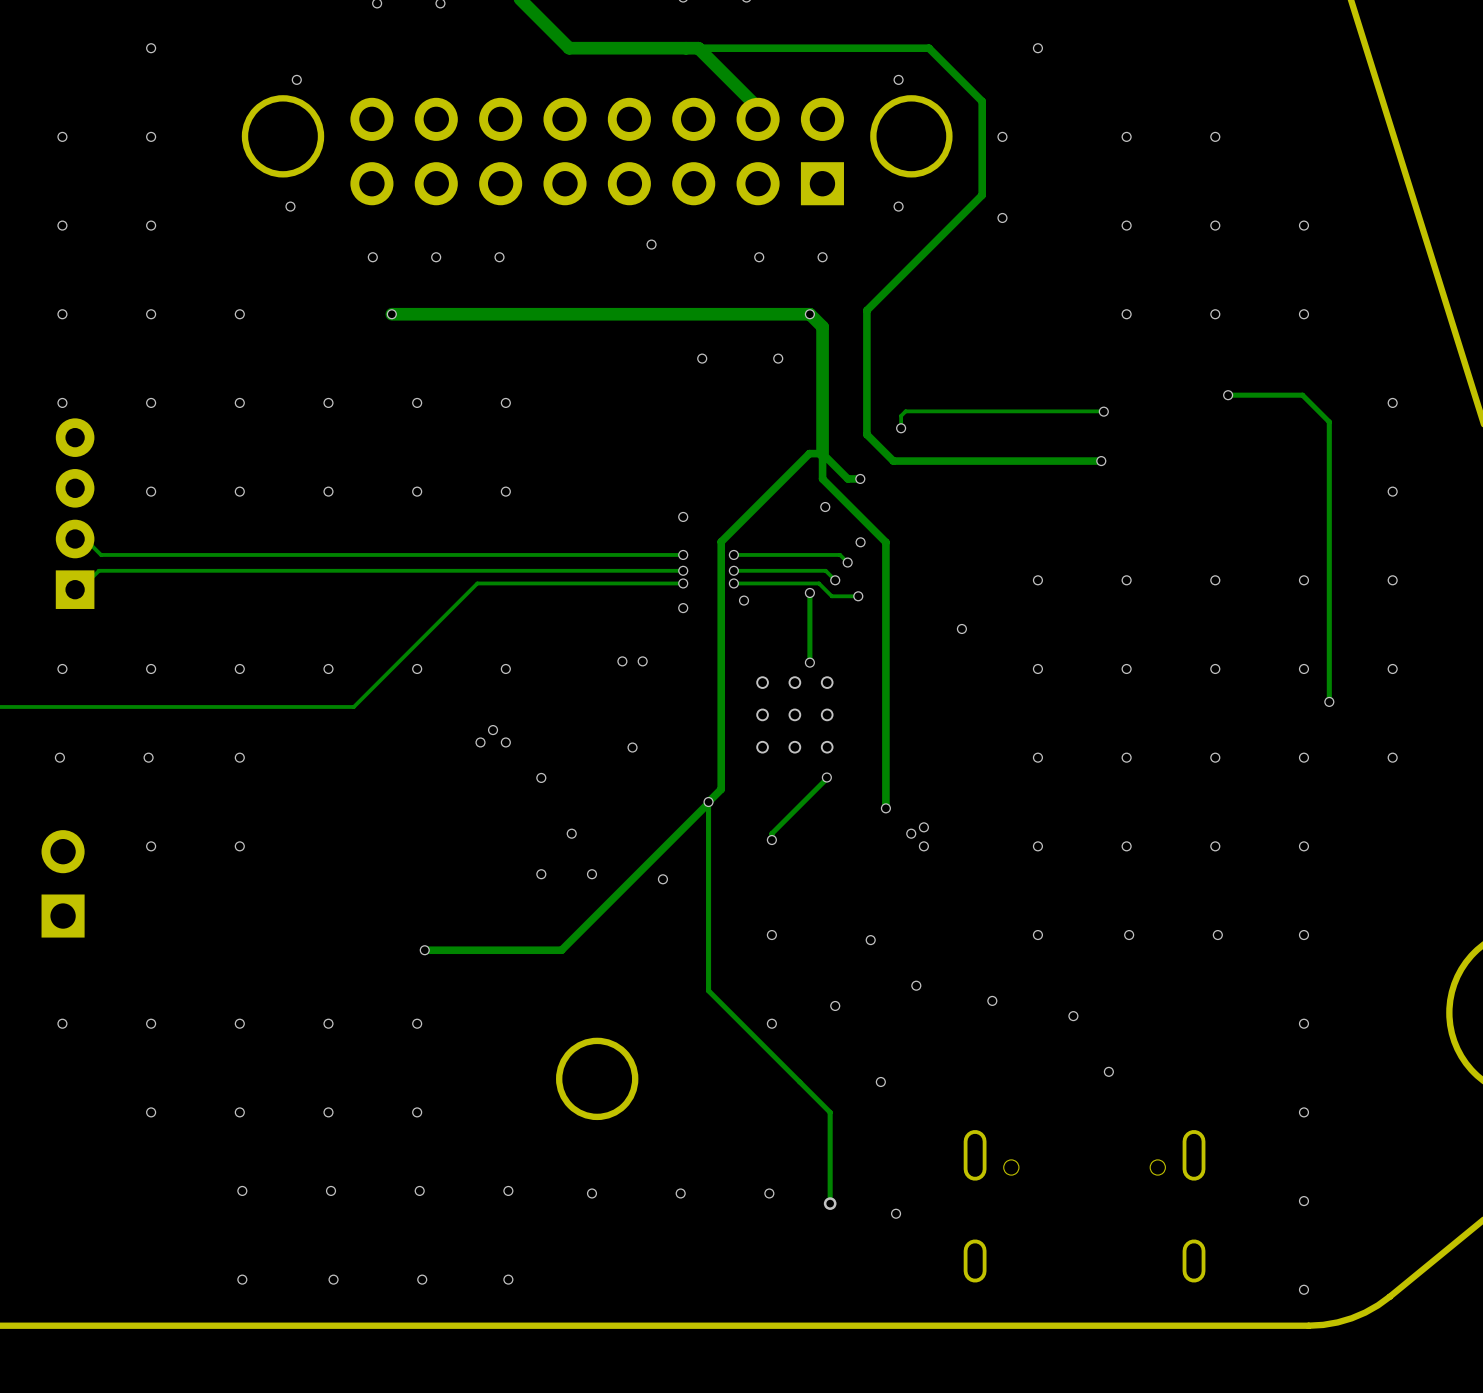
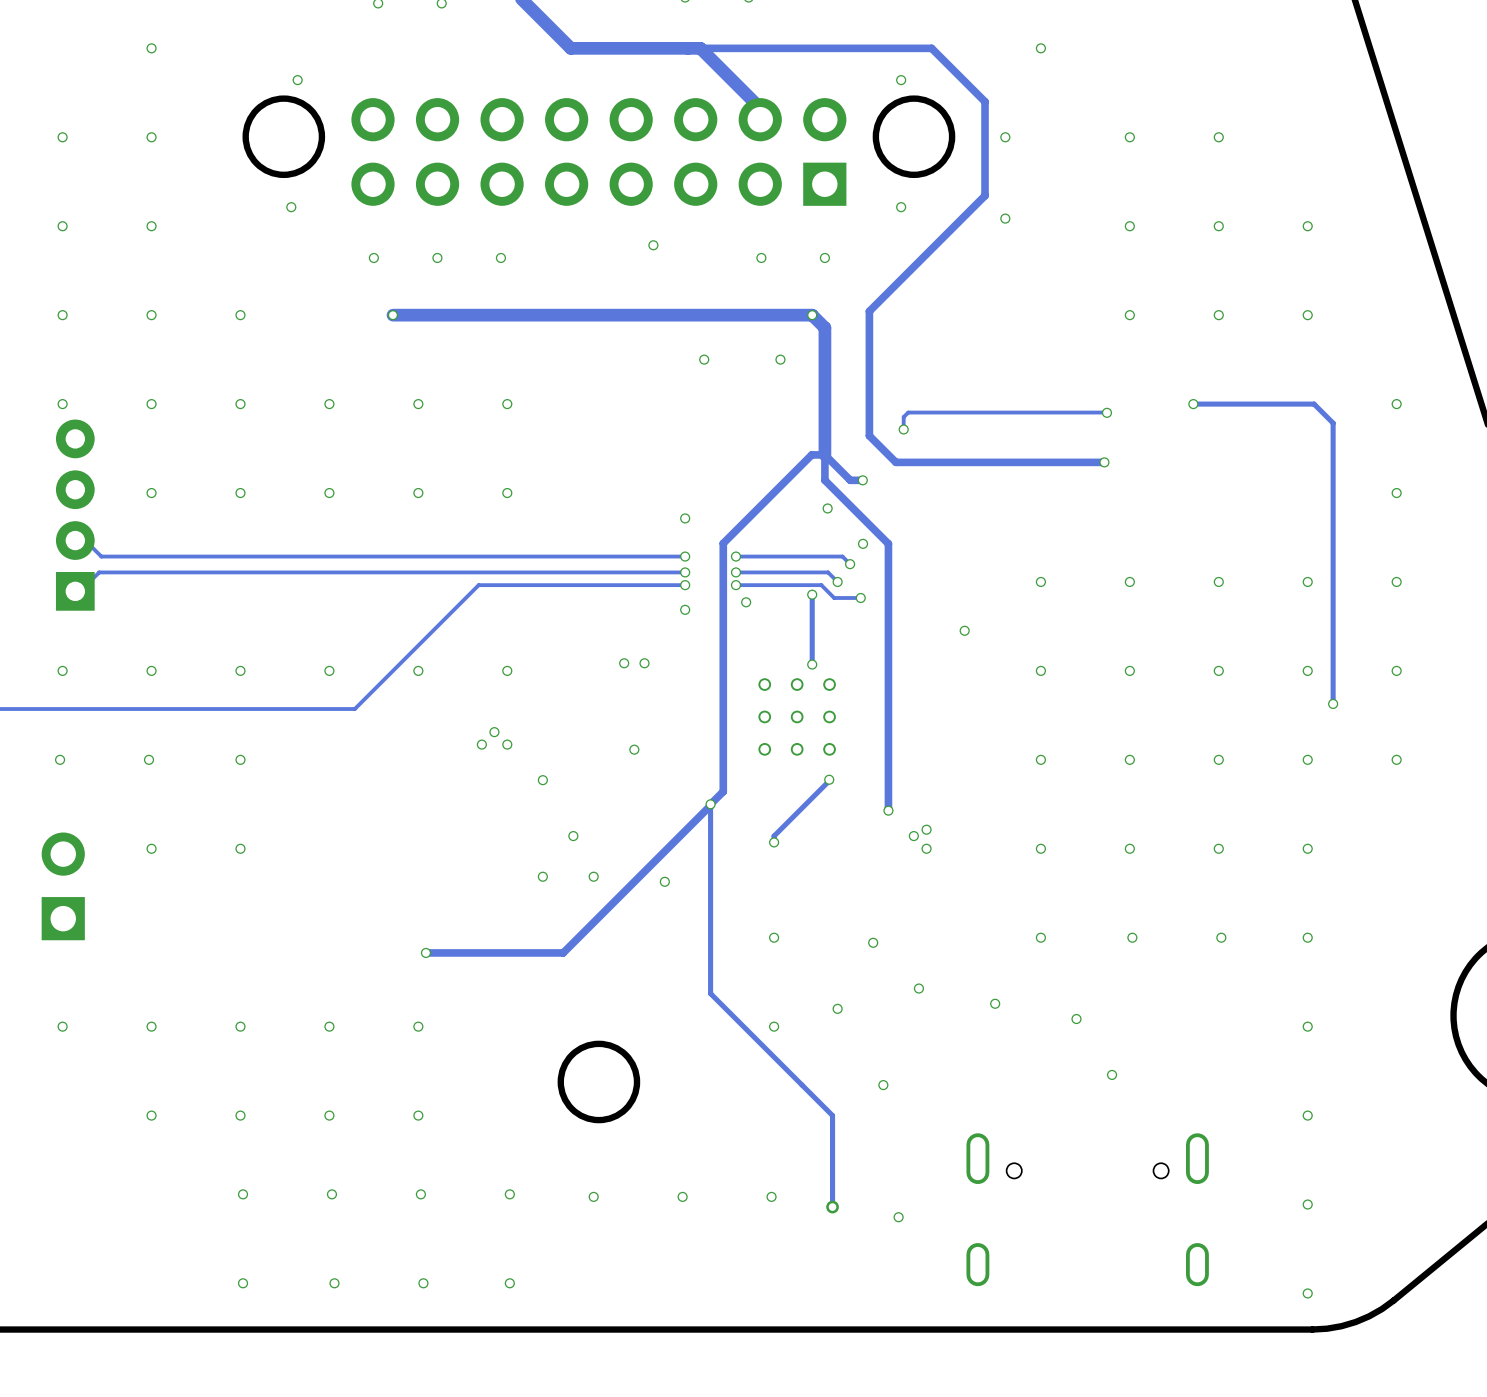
track: (1228, 395) (1302, 395) (1310, 402) -> (1193, 404) (1314, 404)
via position: (1228, 395) -> (1193, 404)

